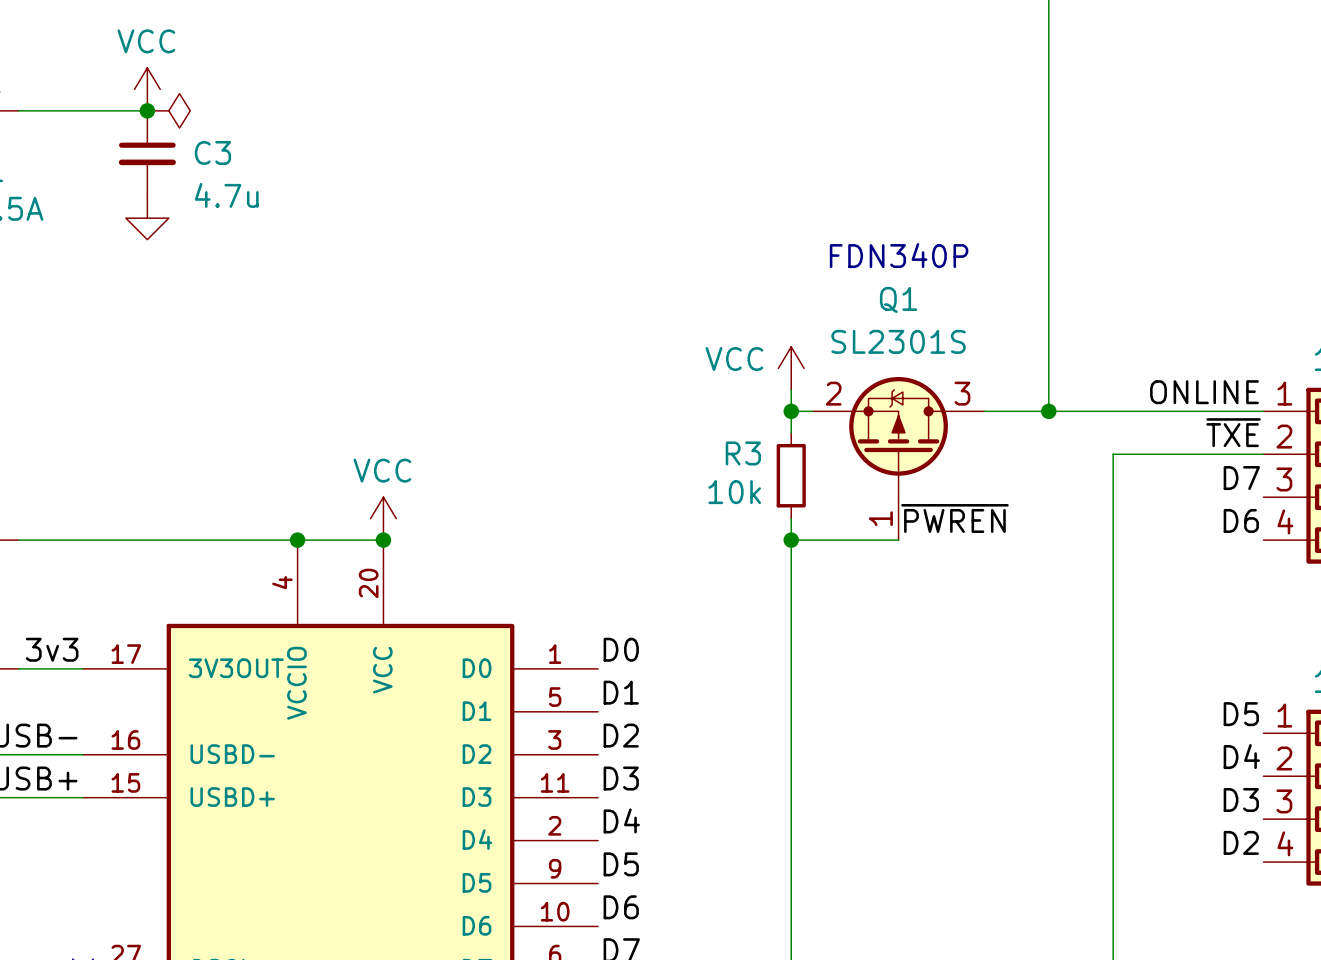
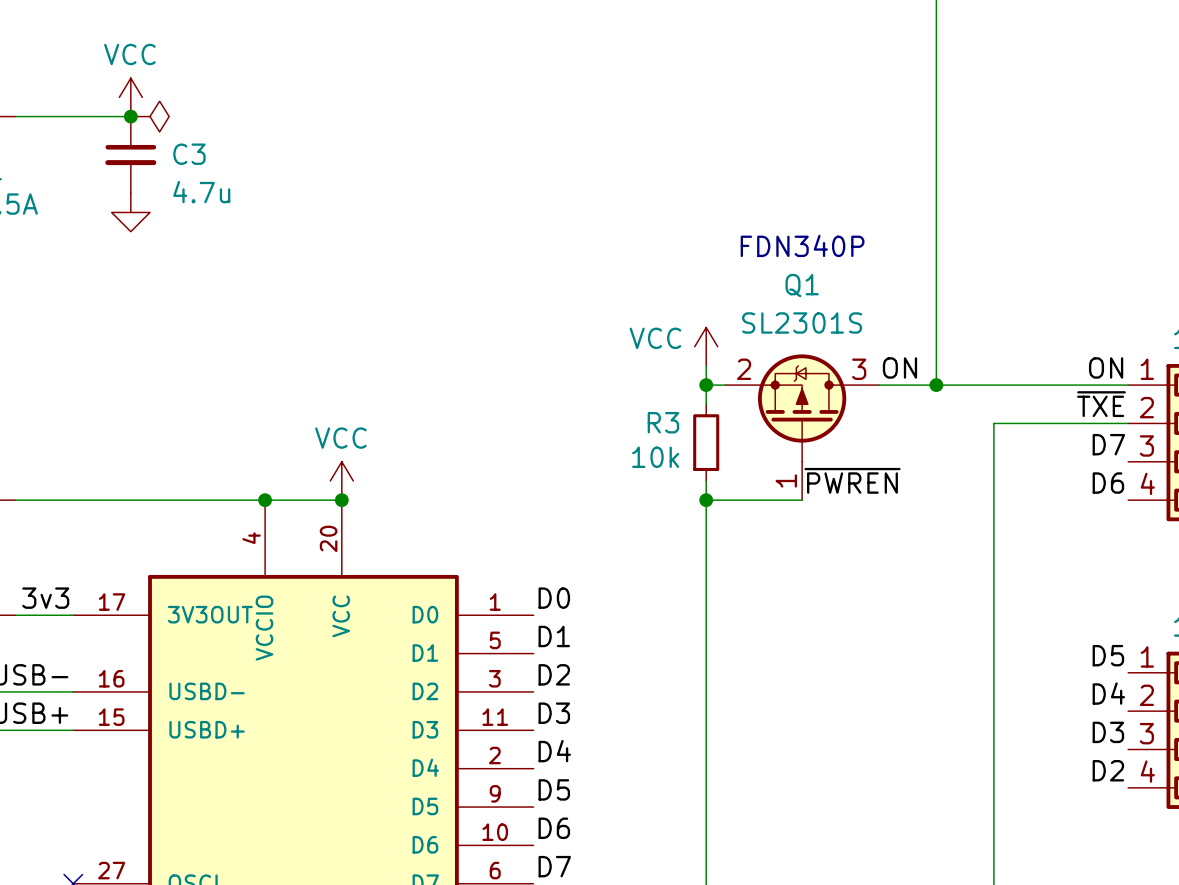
label: none -> ON (899, 367)
label: ONLINE (1204, 392) -> ON (1106, 367)

